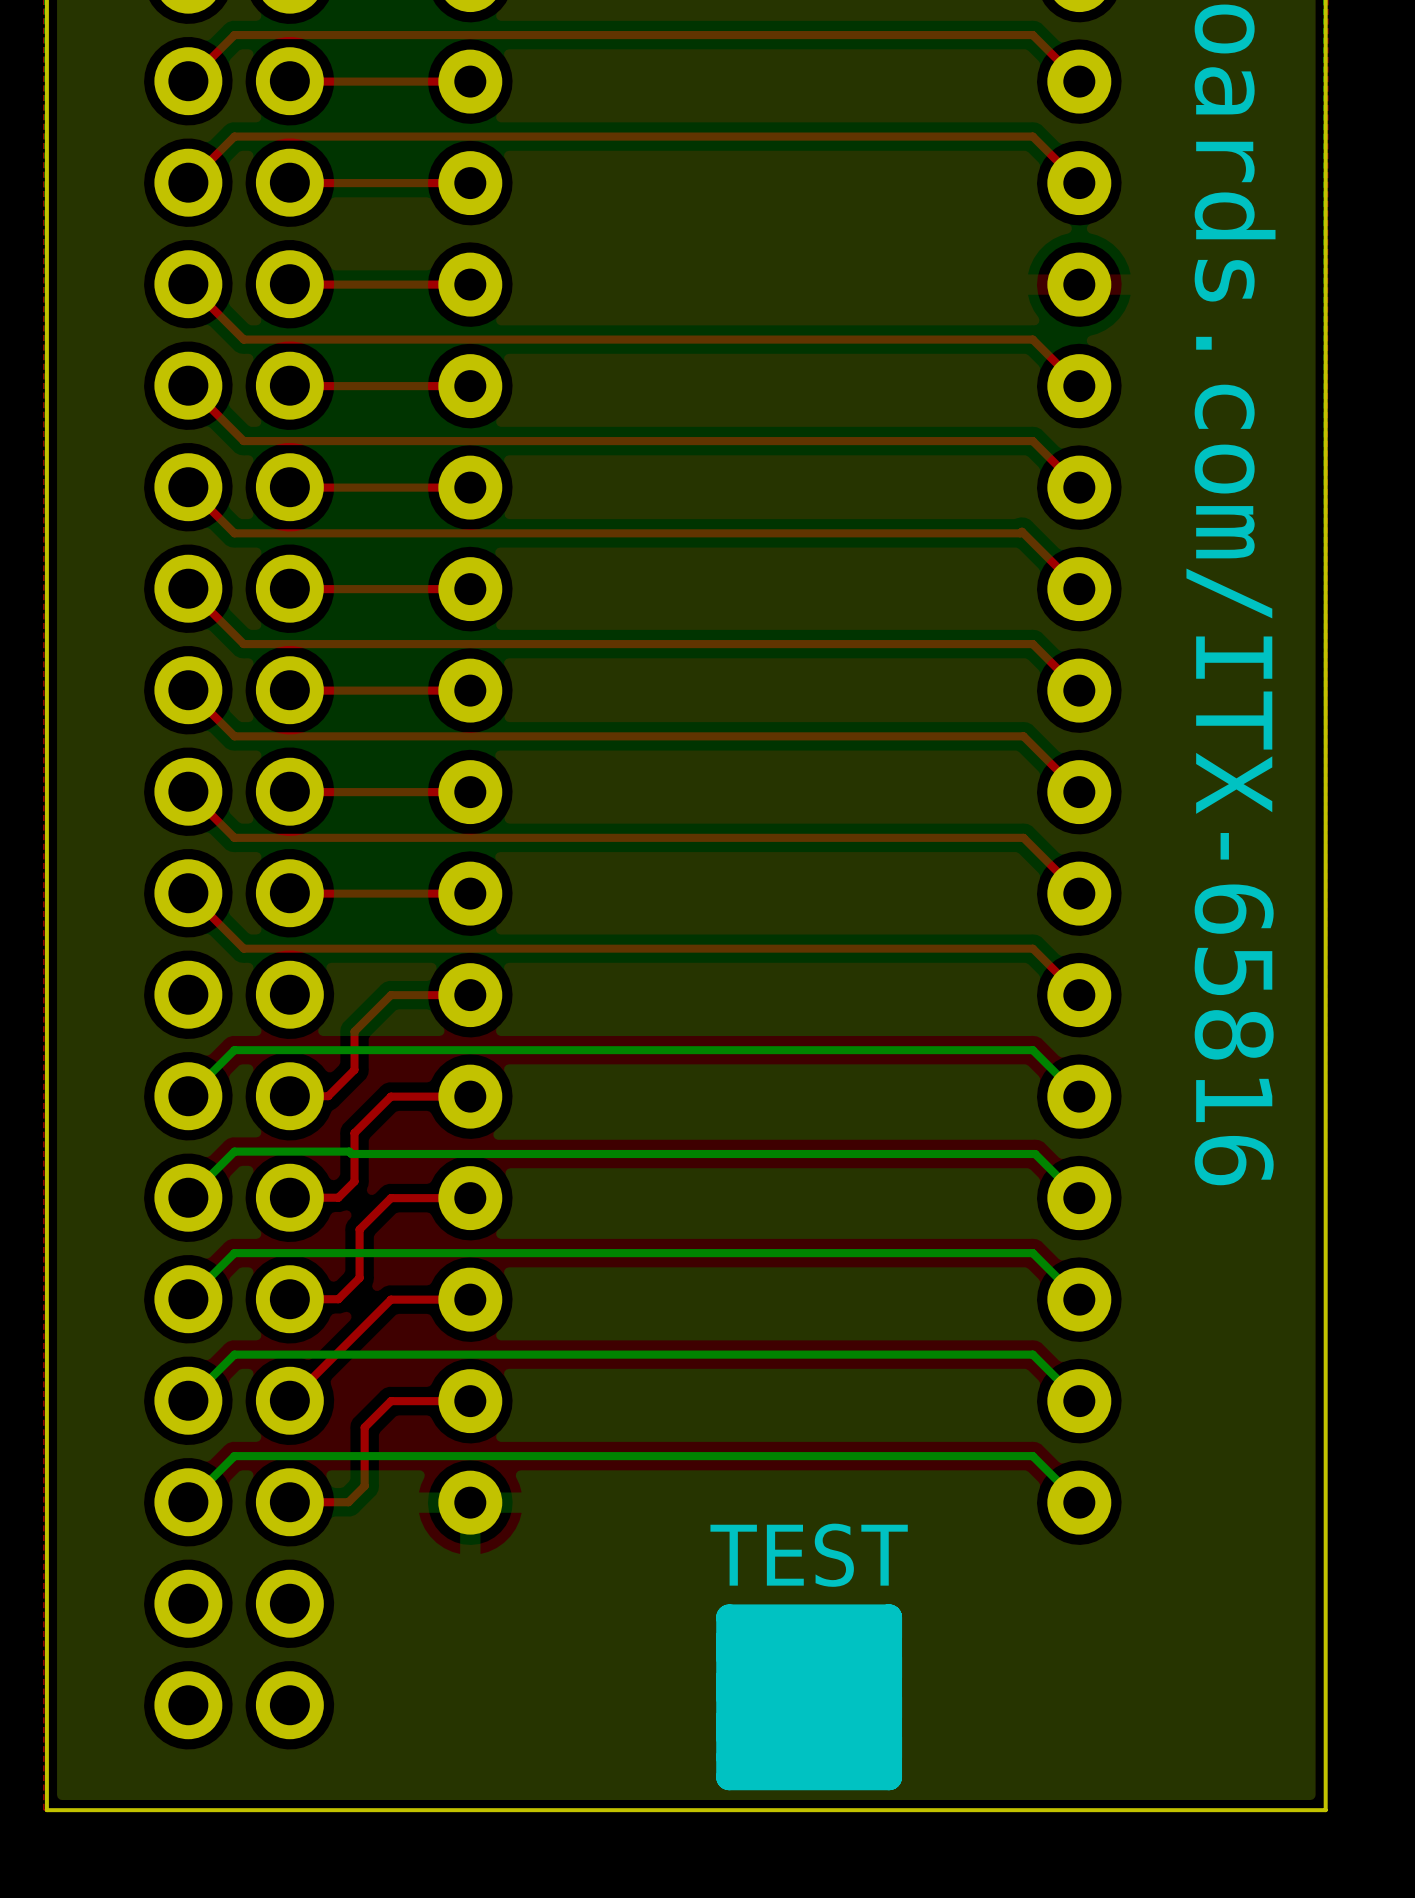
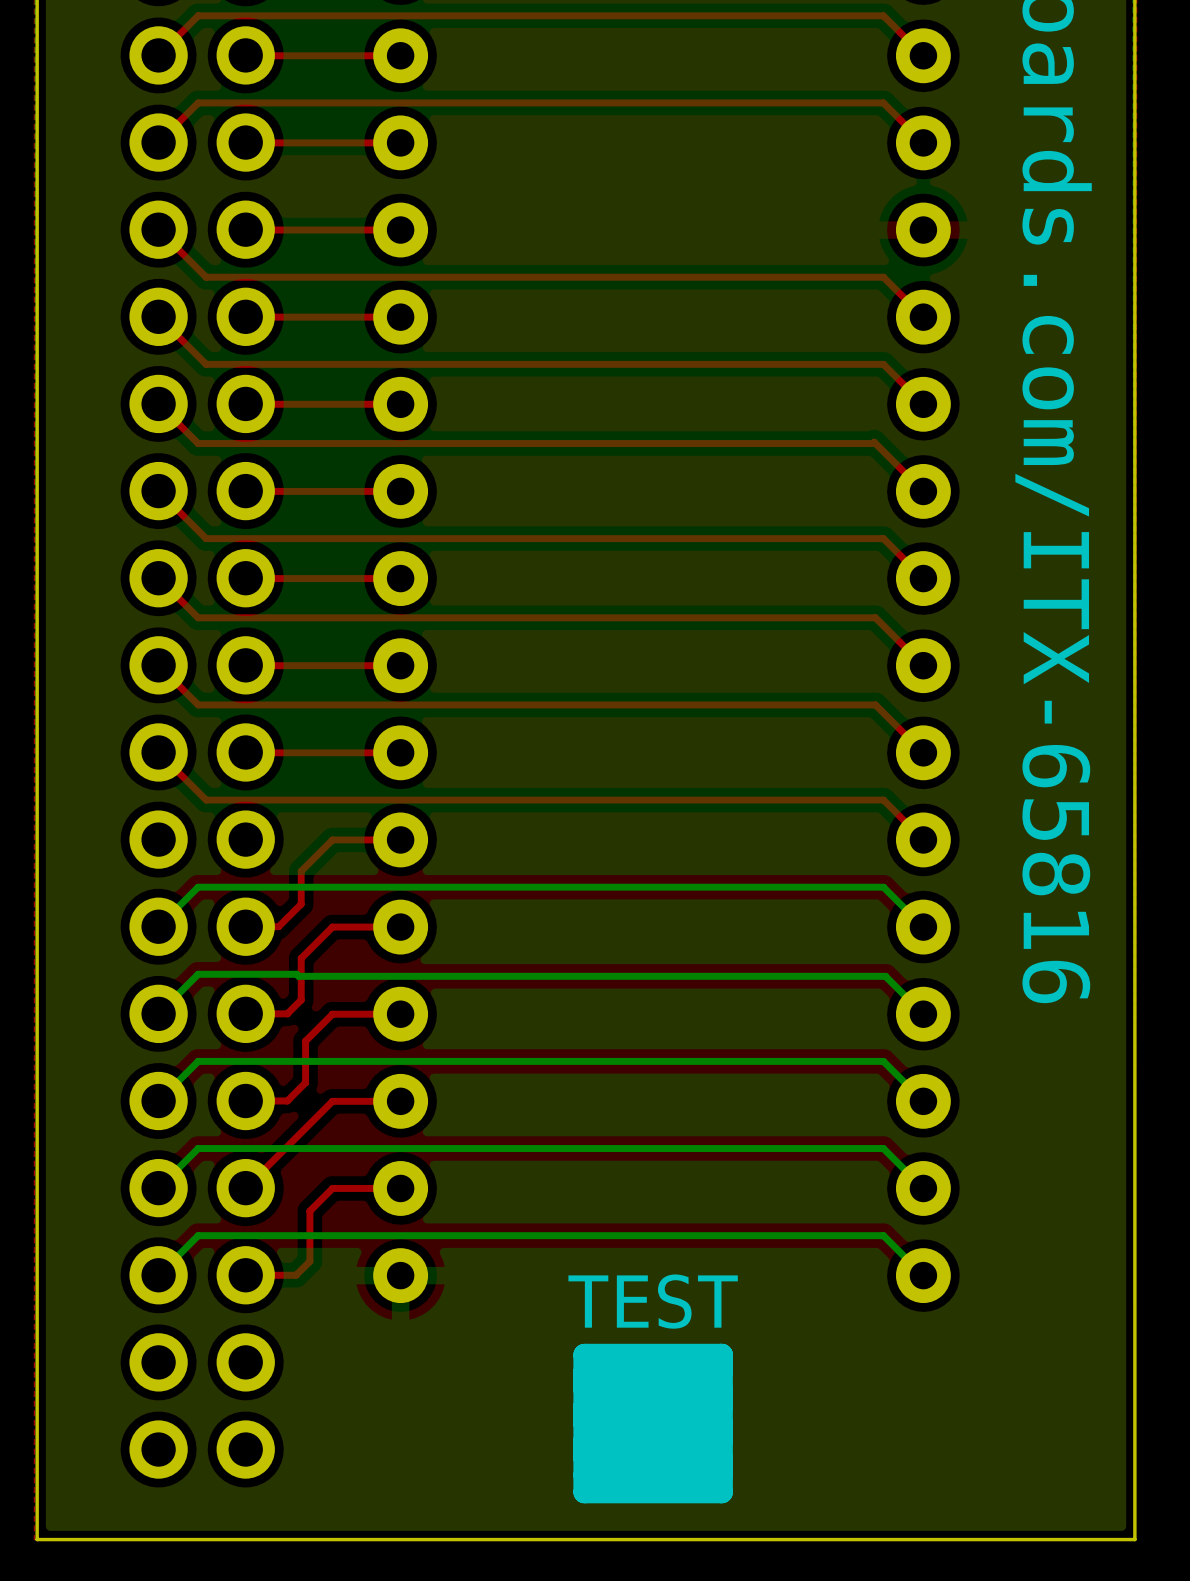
TEST position: (809, 1697) -> (653, 1423)

